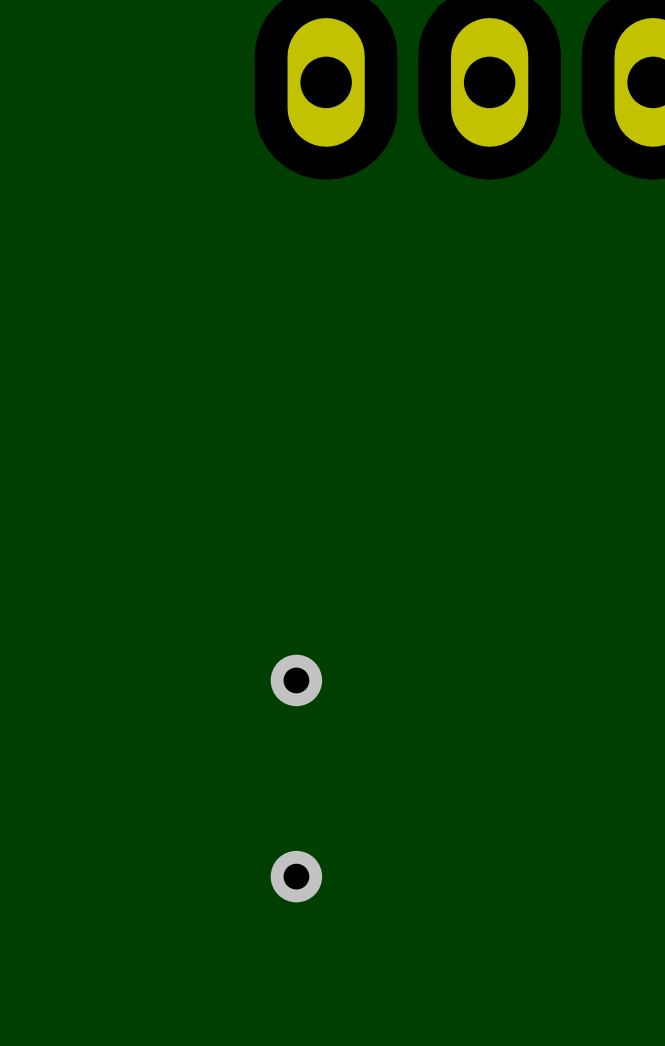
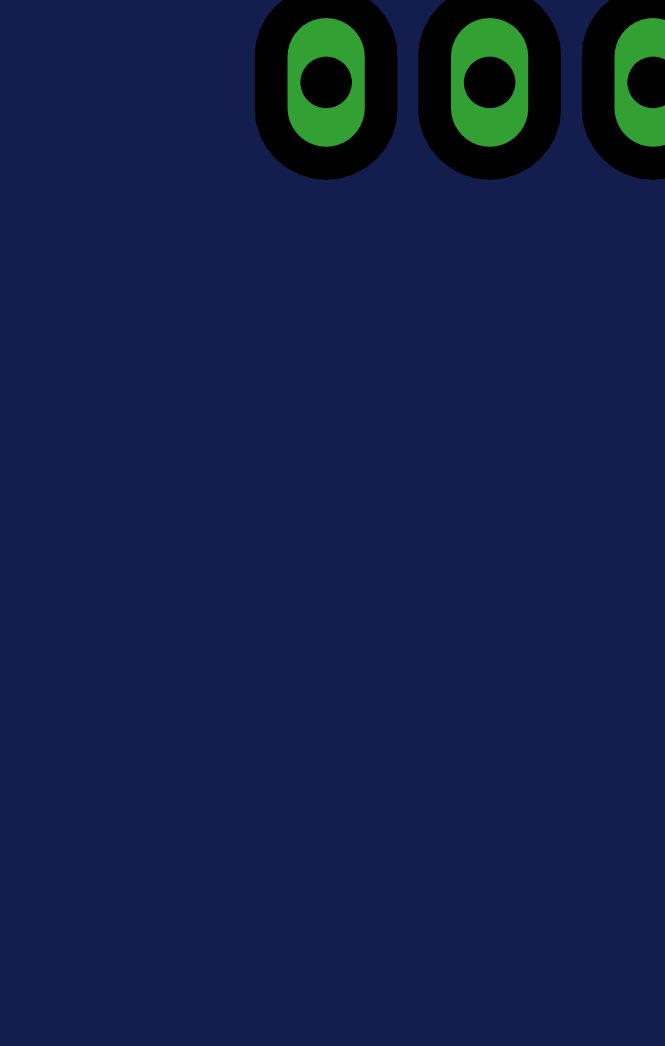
via: (296, 680) -> none
via: (296, 876) -> none

